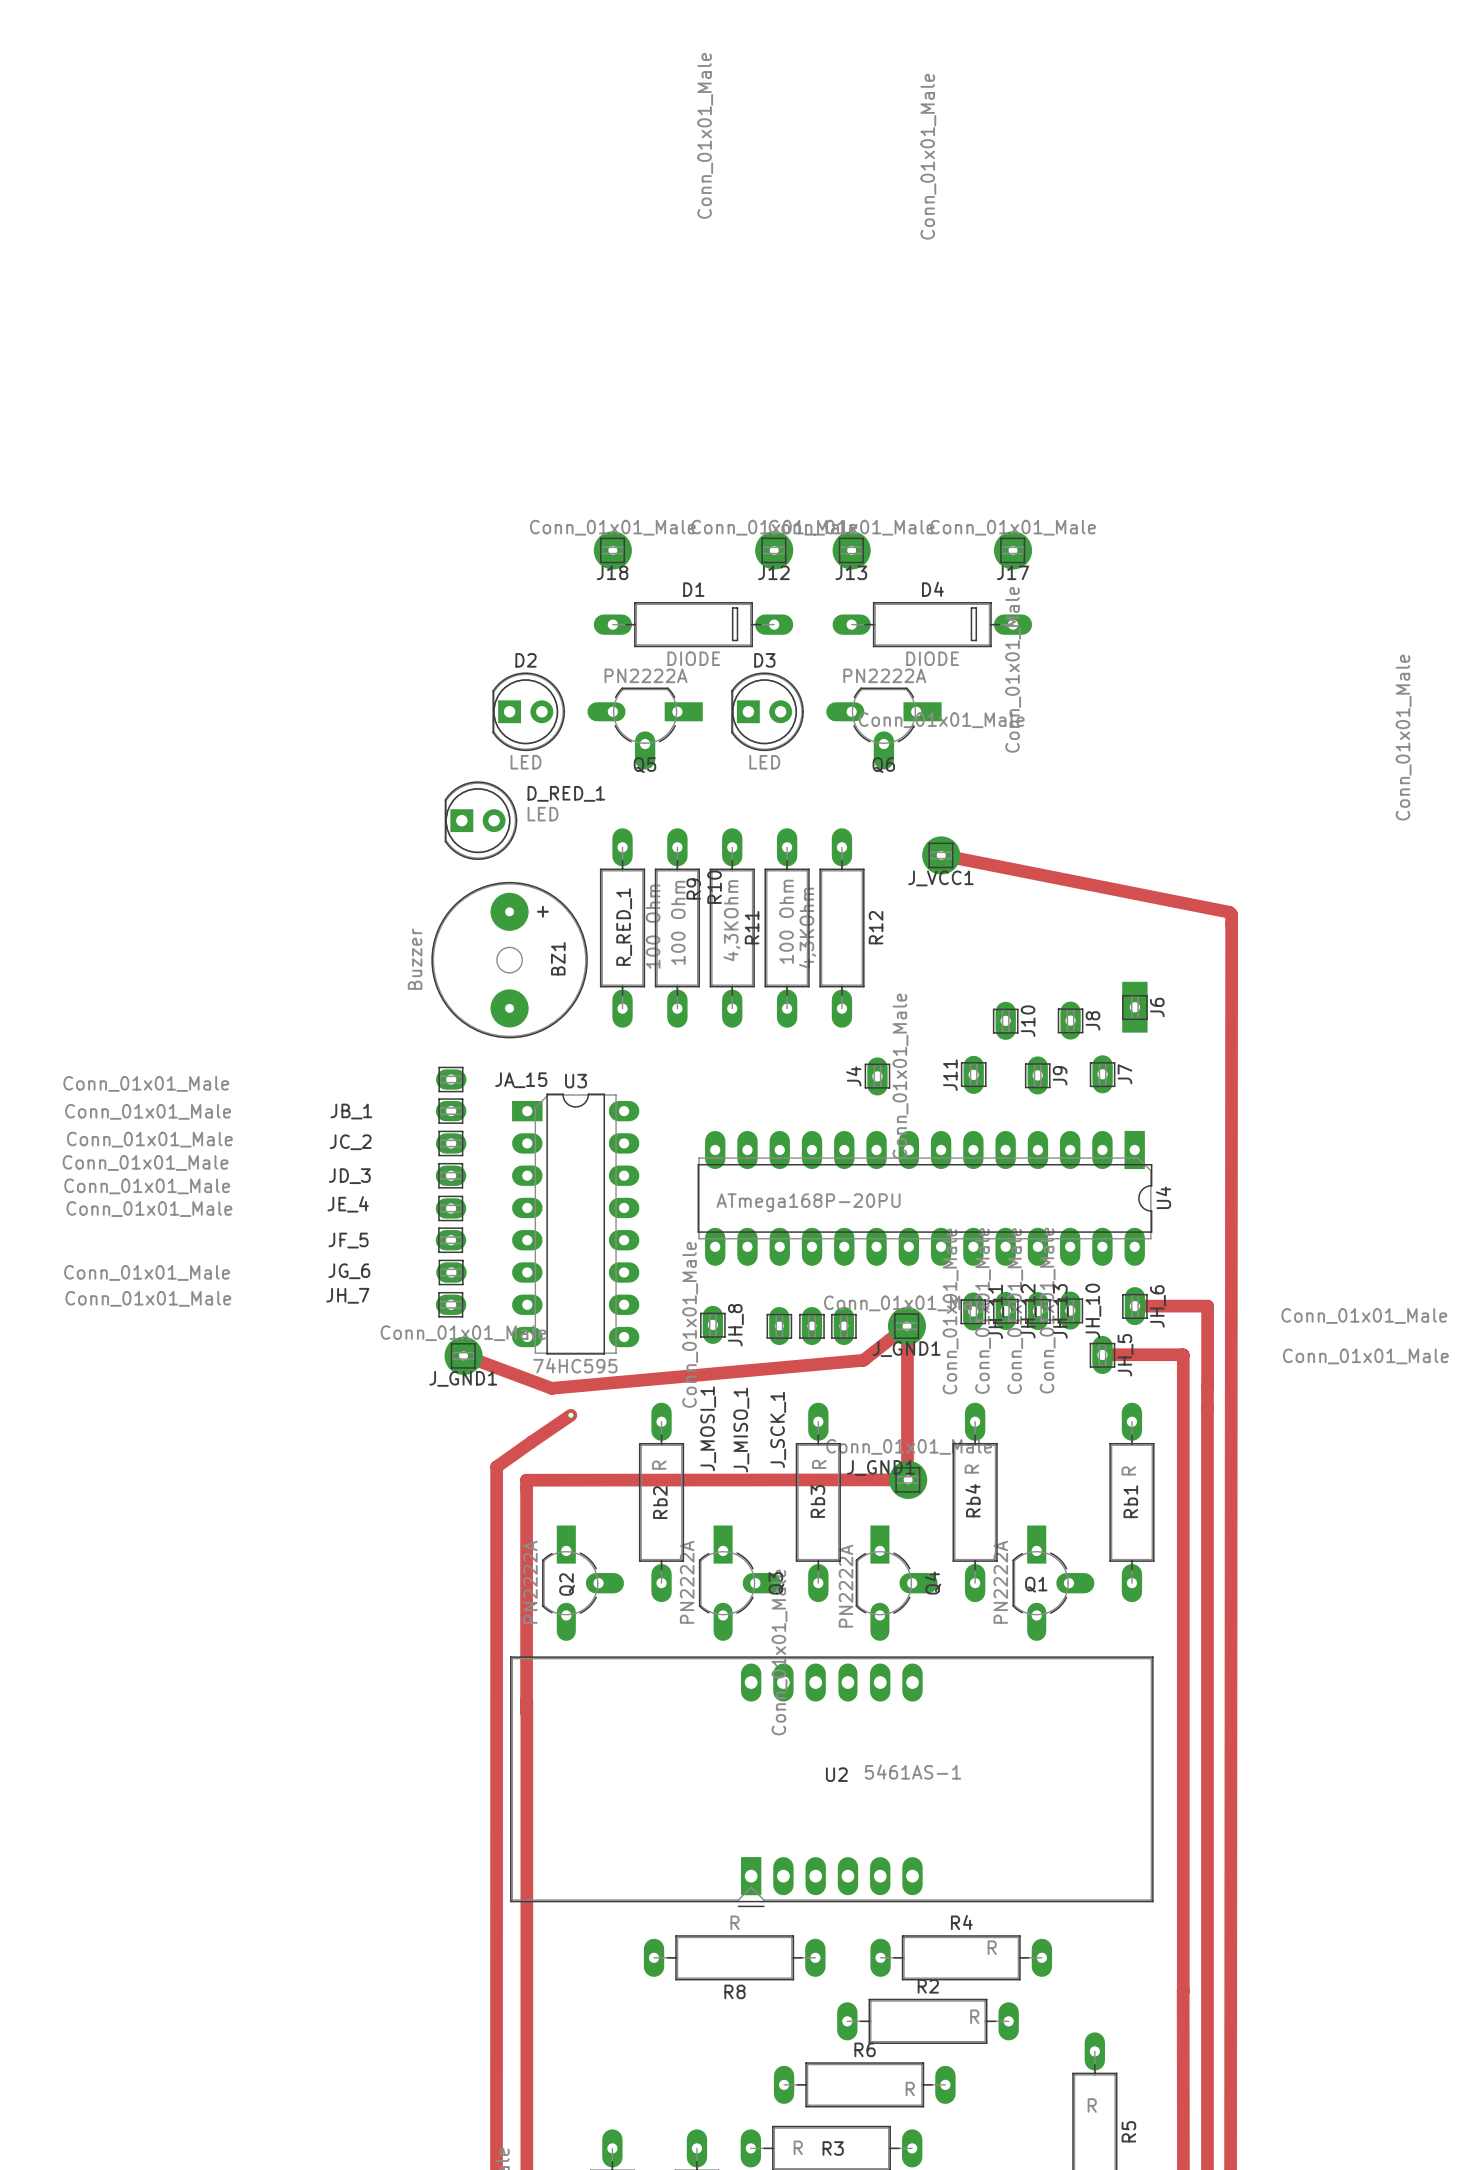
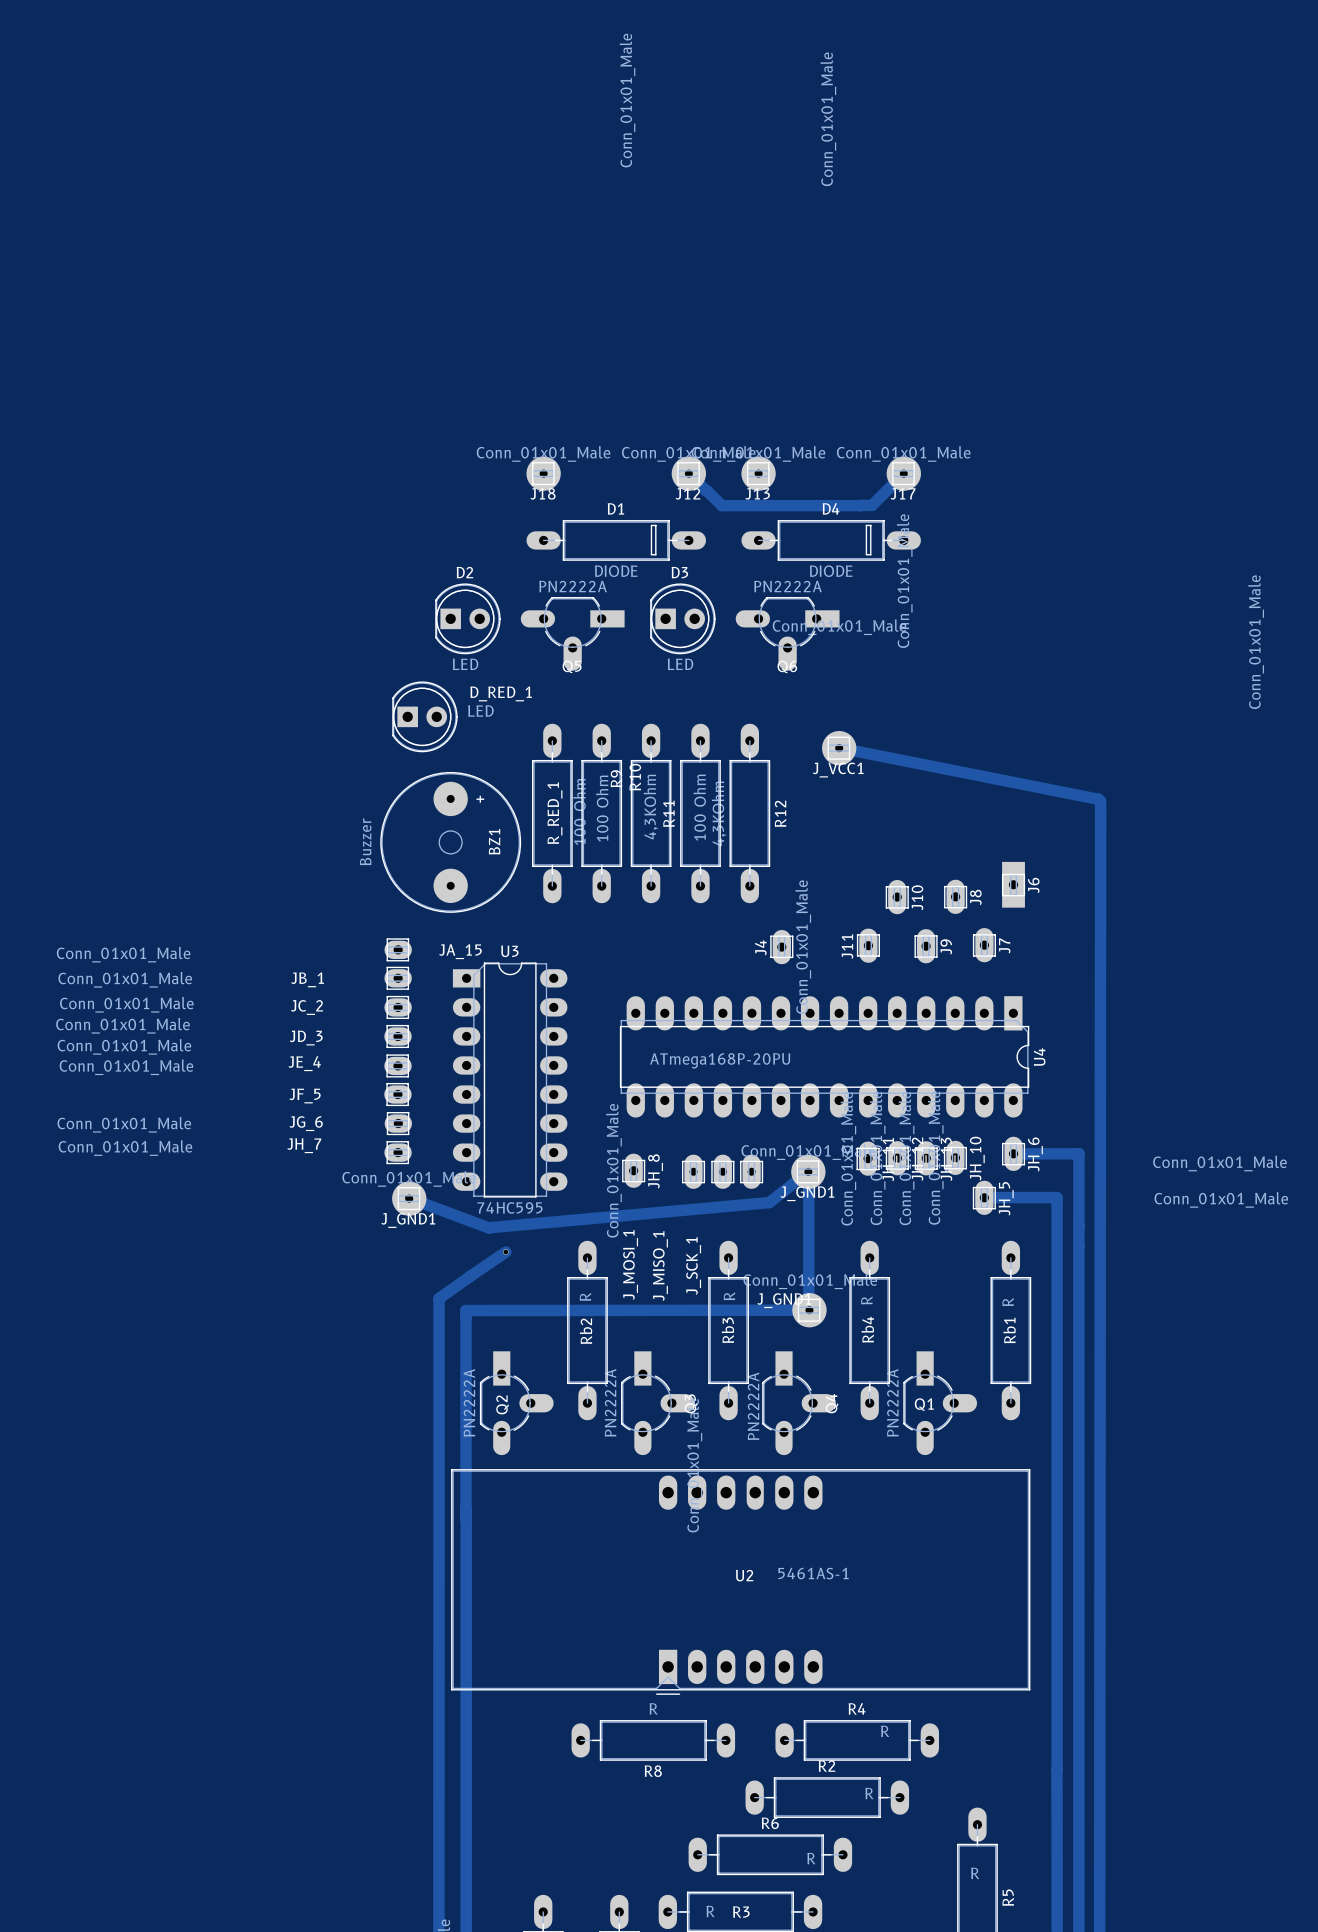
track: none -> (688, 473) (721, 505) (872, 505) (903, 473)

